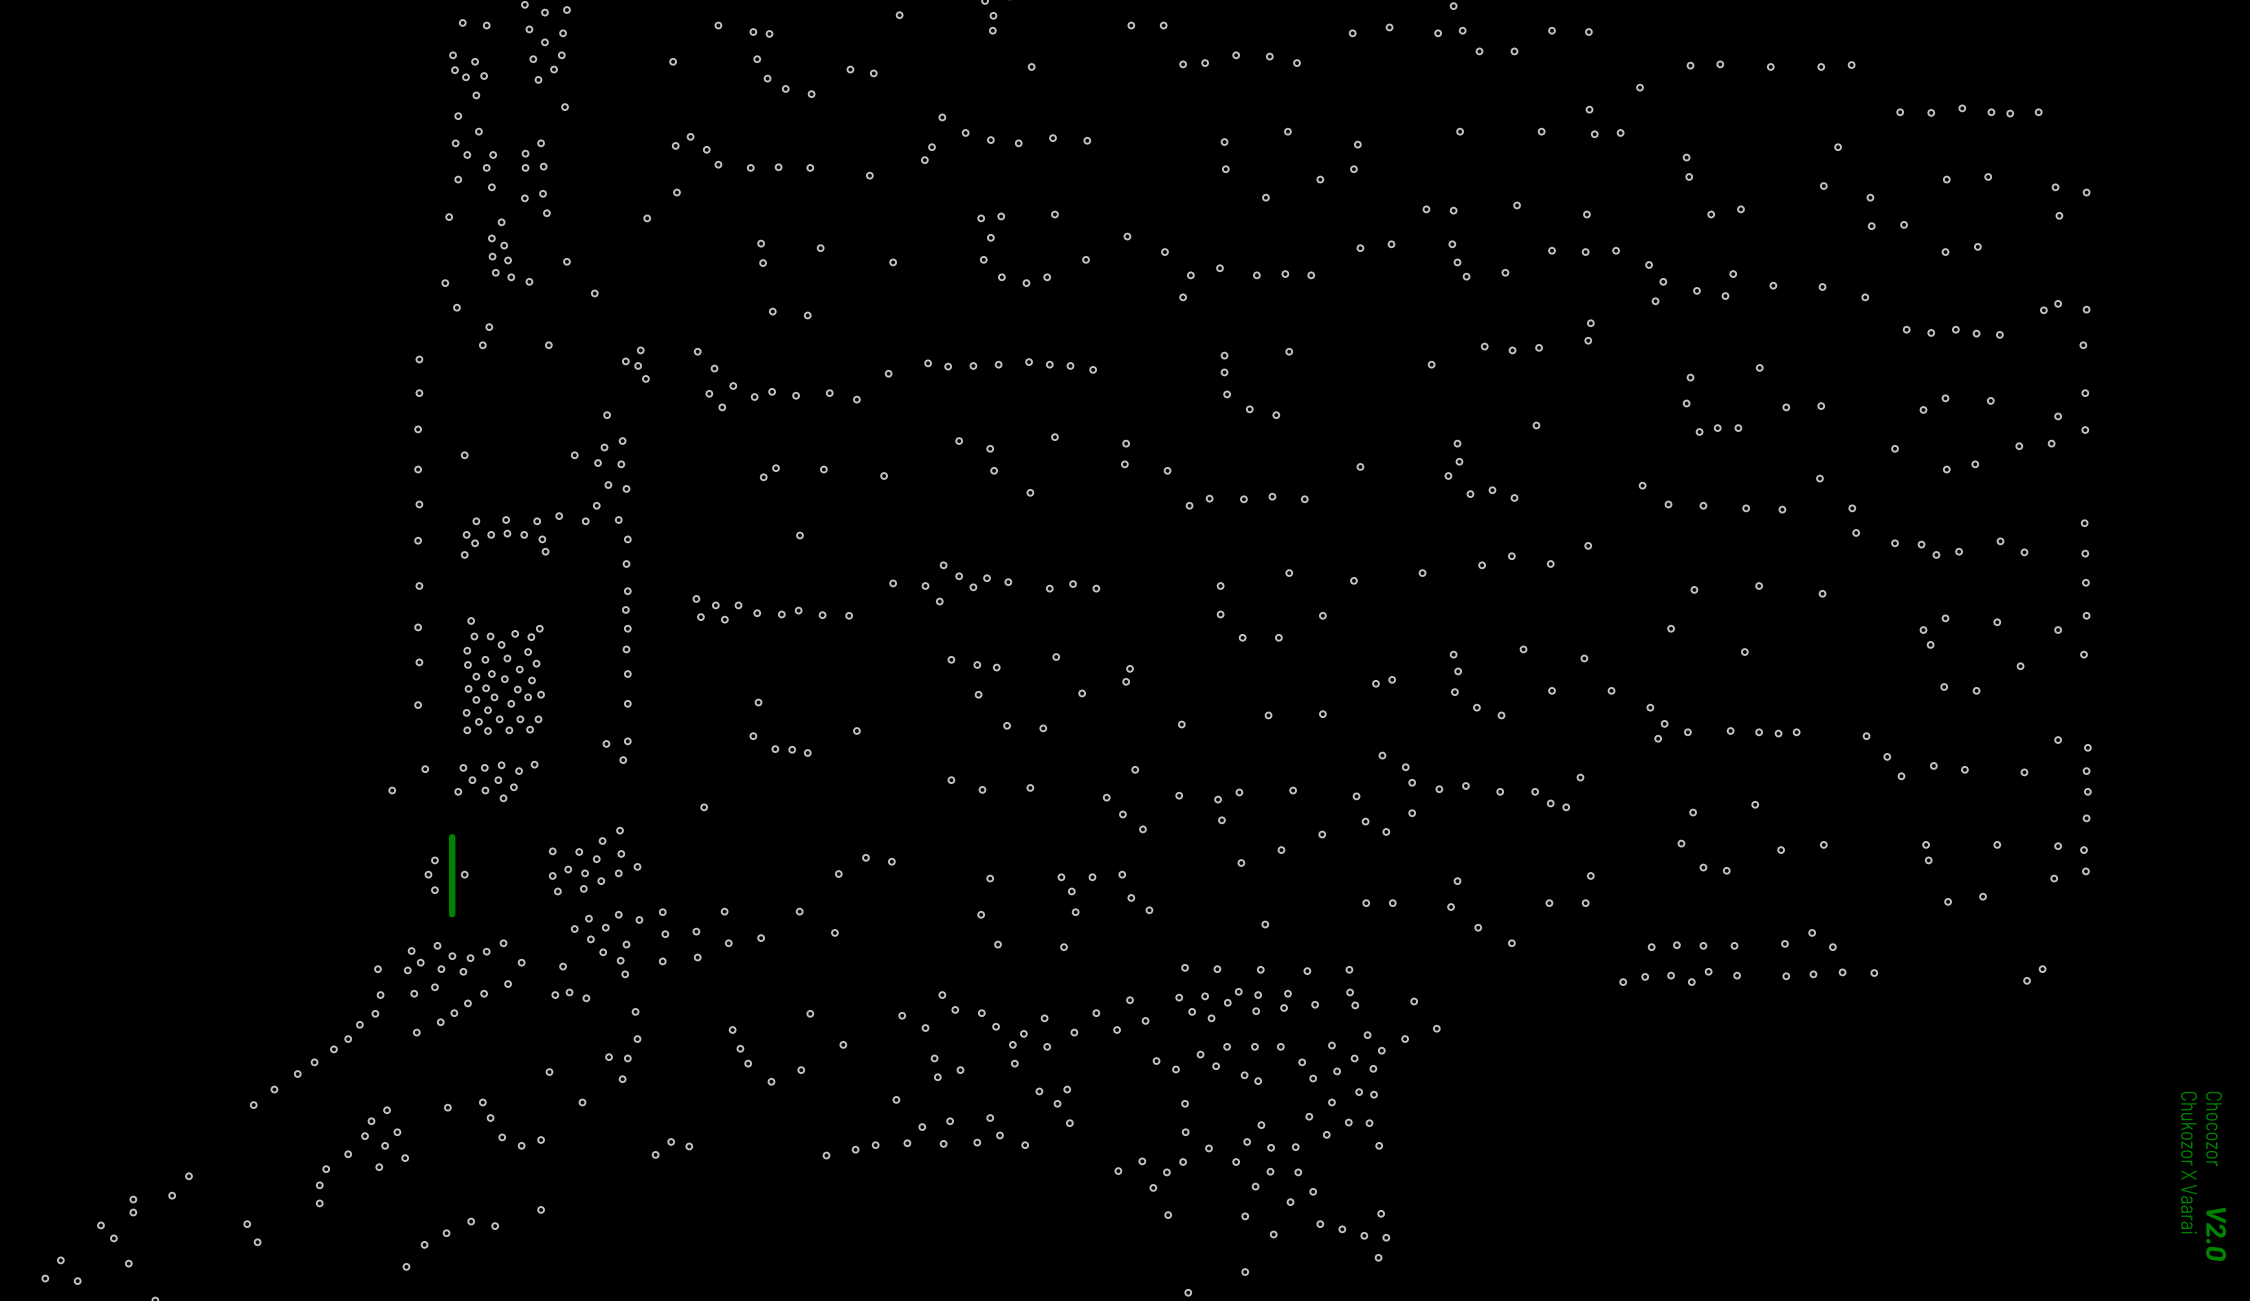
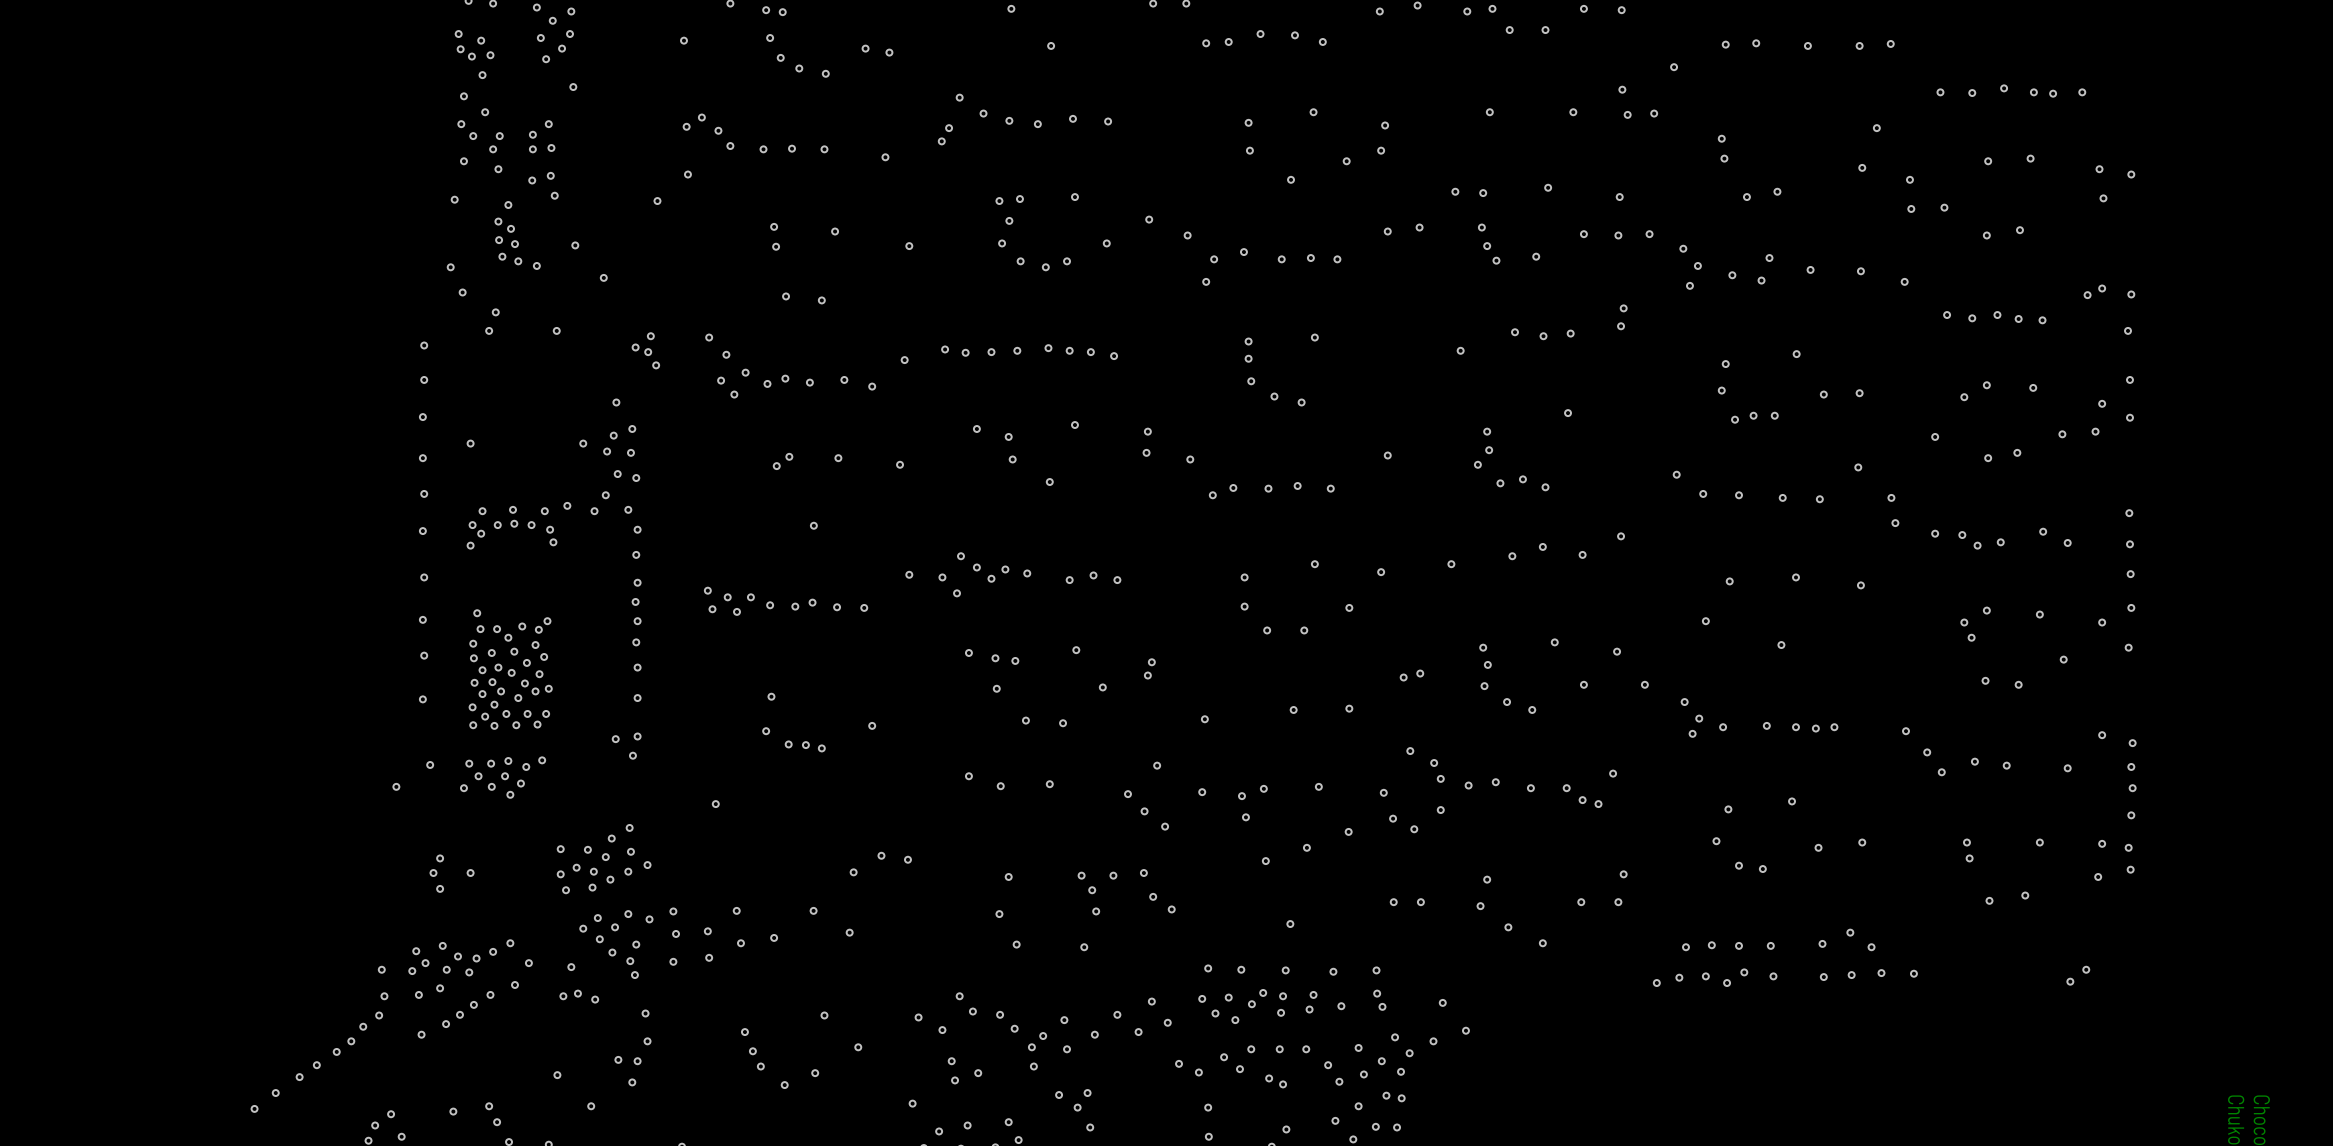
track: (452, 837) (452, 914) -> none

